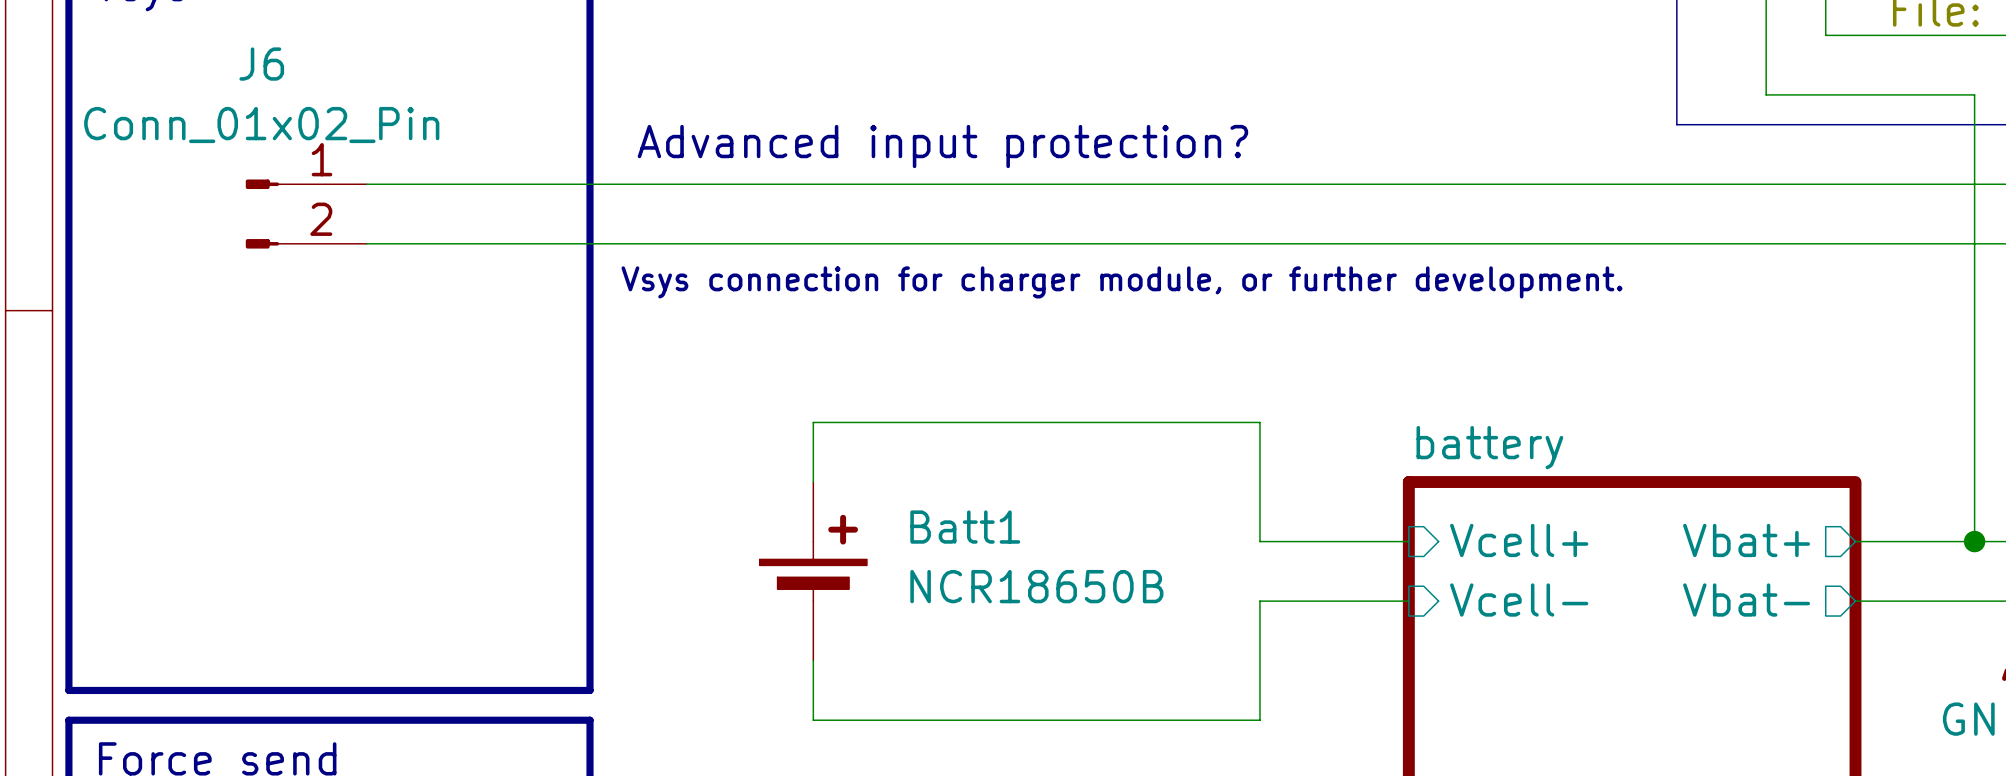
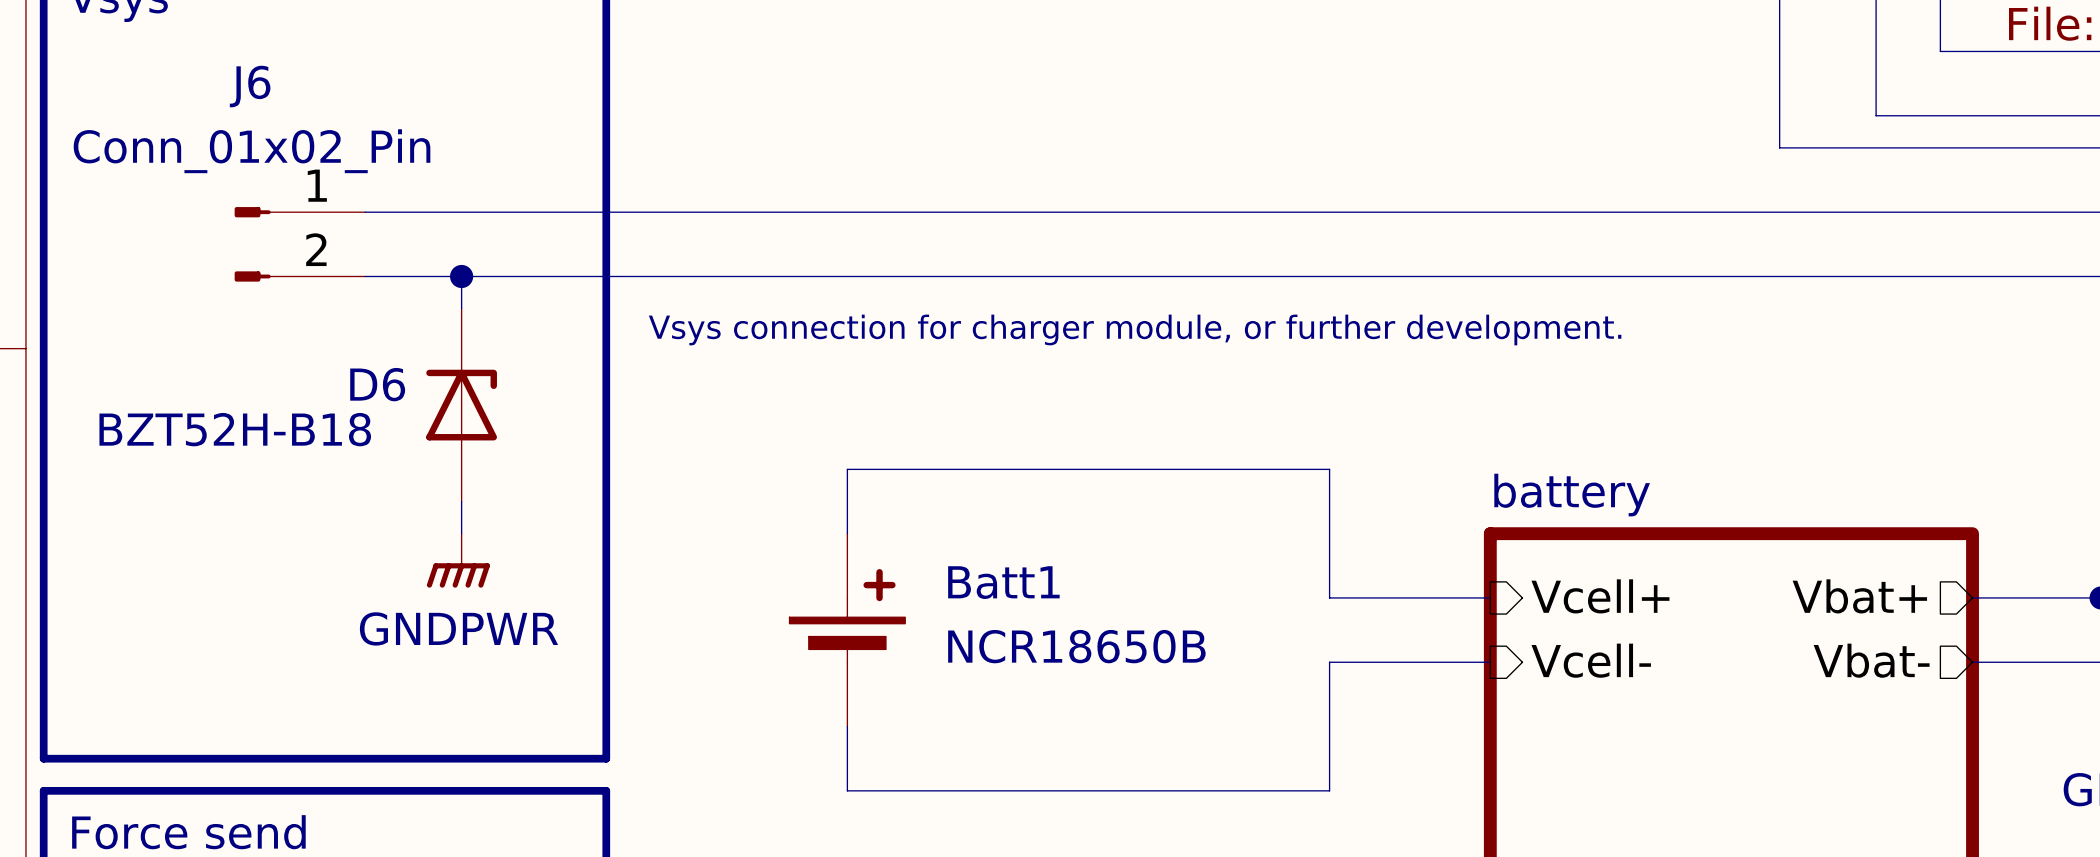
text: Advanced input protection? (942, 146) -> none
wire: none -> (461, 276) (461, 308)
junction: none -> (461, 276)
text position: Vsys connection for charger module, or further development. (1121, 282) -> Vsys connection for charger module, or further development. (1135, 329)
D6: none -> BZT52H-B18 (461, 405)
wire: none -> (461, 501) (461, 533)
power symbol: none -> GNDPWR (458, 560)

